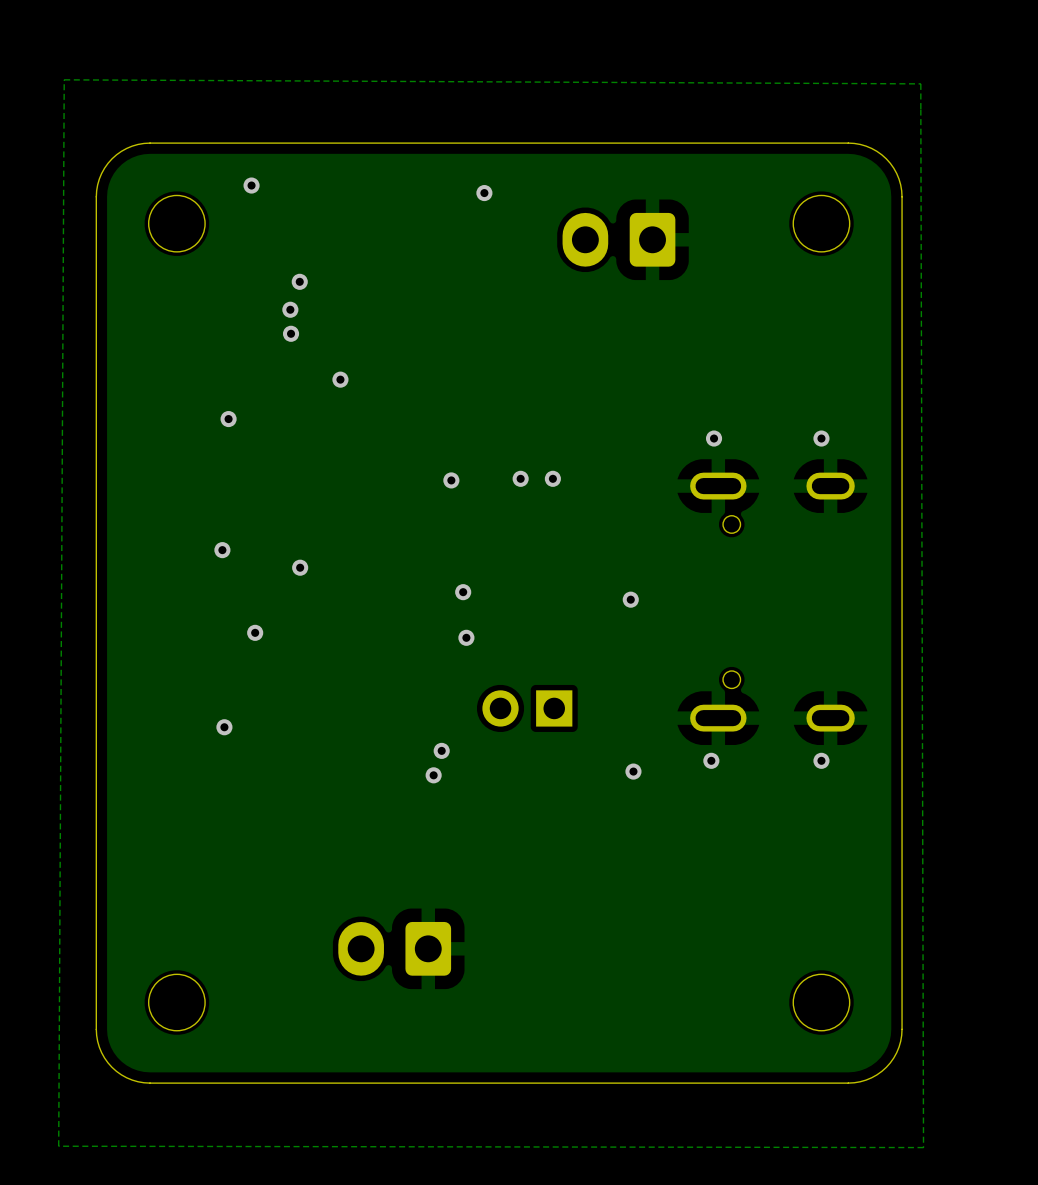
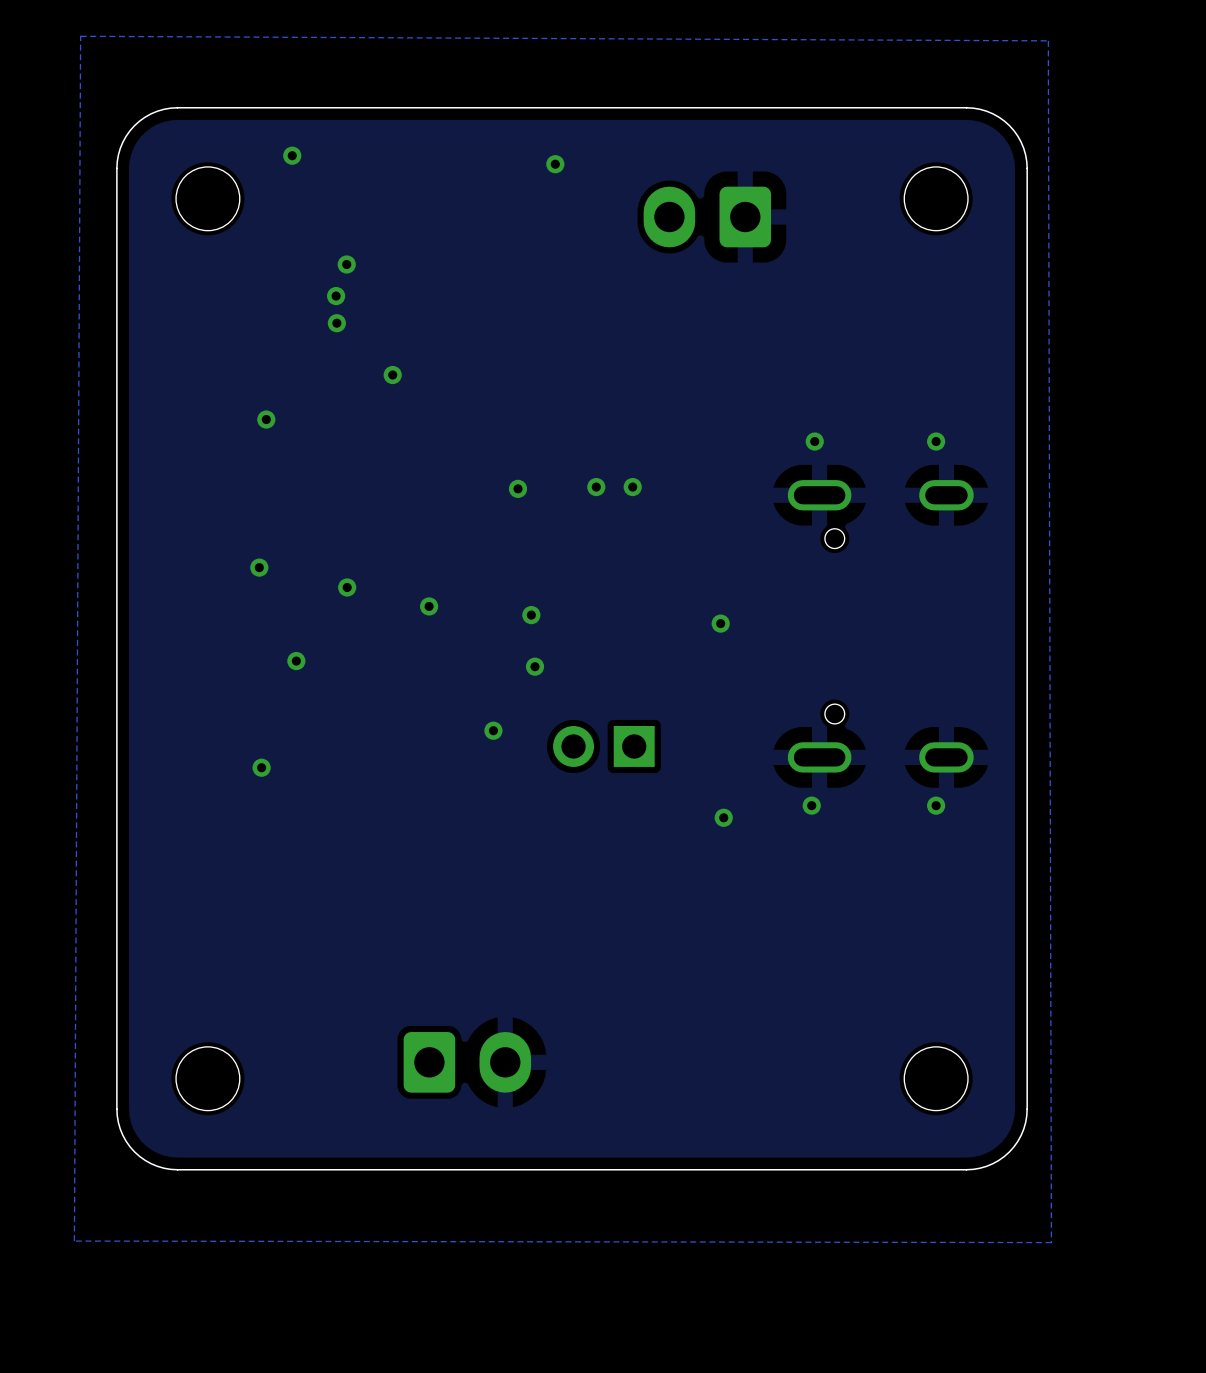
via: none -> (429, 606)
via: none -> (493, 730)
via: (441, 750) -> none
via: (433, 775) -> none
part rotation: 0° (394, 948) -> 180° (467, 1062)

